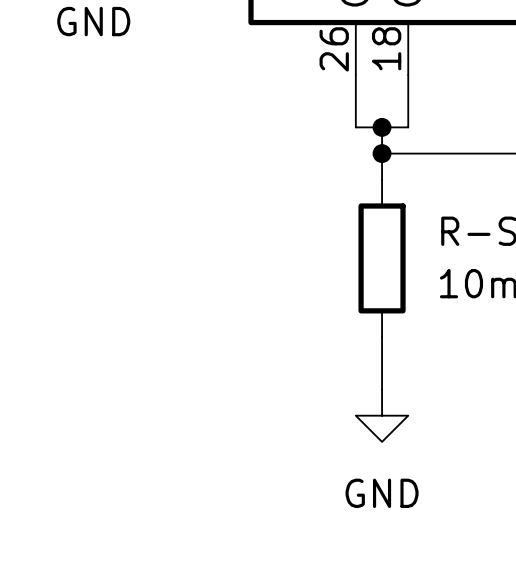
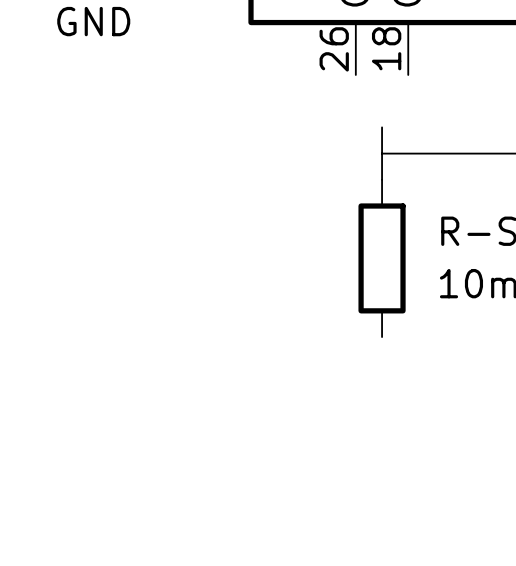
wire: (355, 74) (355, 127) (408, 127) (408, 74) -> none
junction: (382, 127) -> none
junction: (382, 153) -> none
wire: (382, 337) (382, 389) -> none
power symbol: GND (382, 415) -> none

